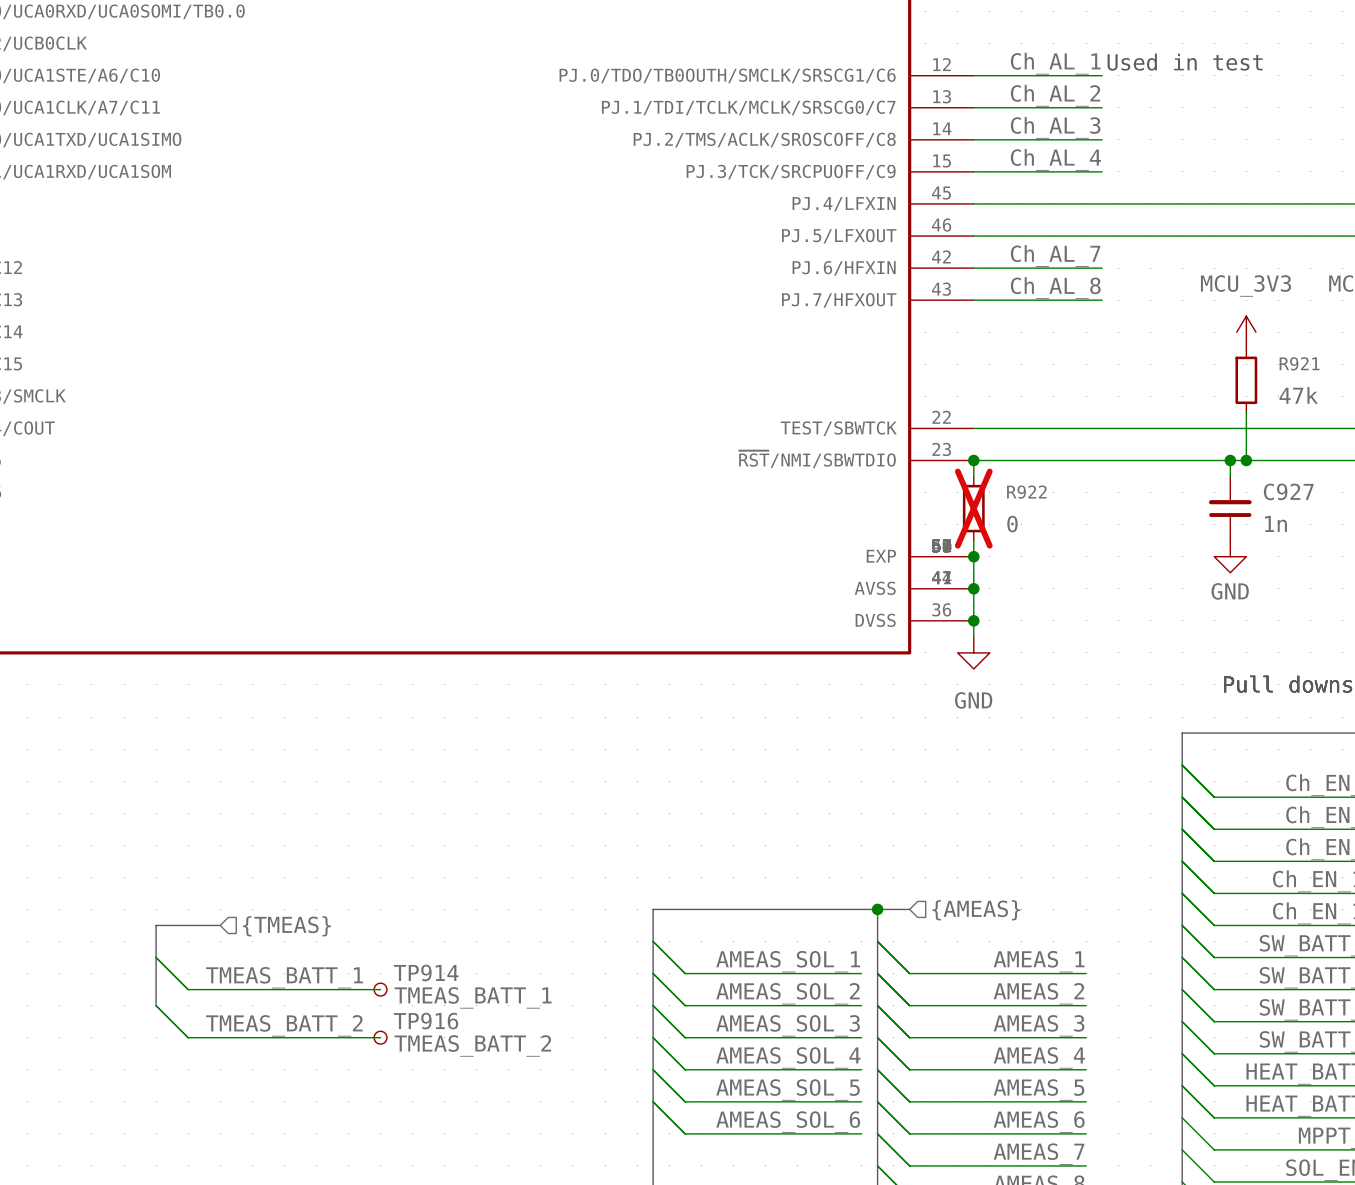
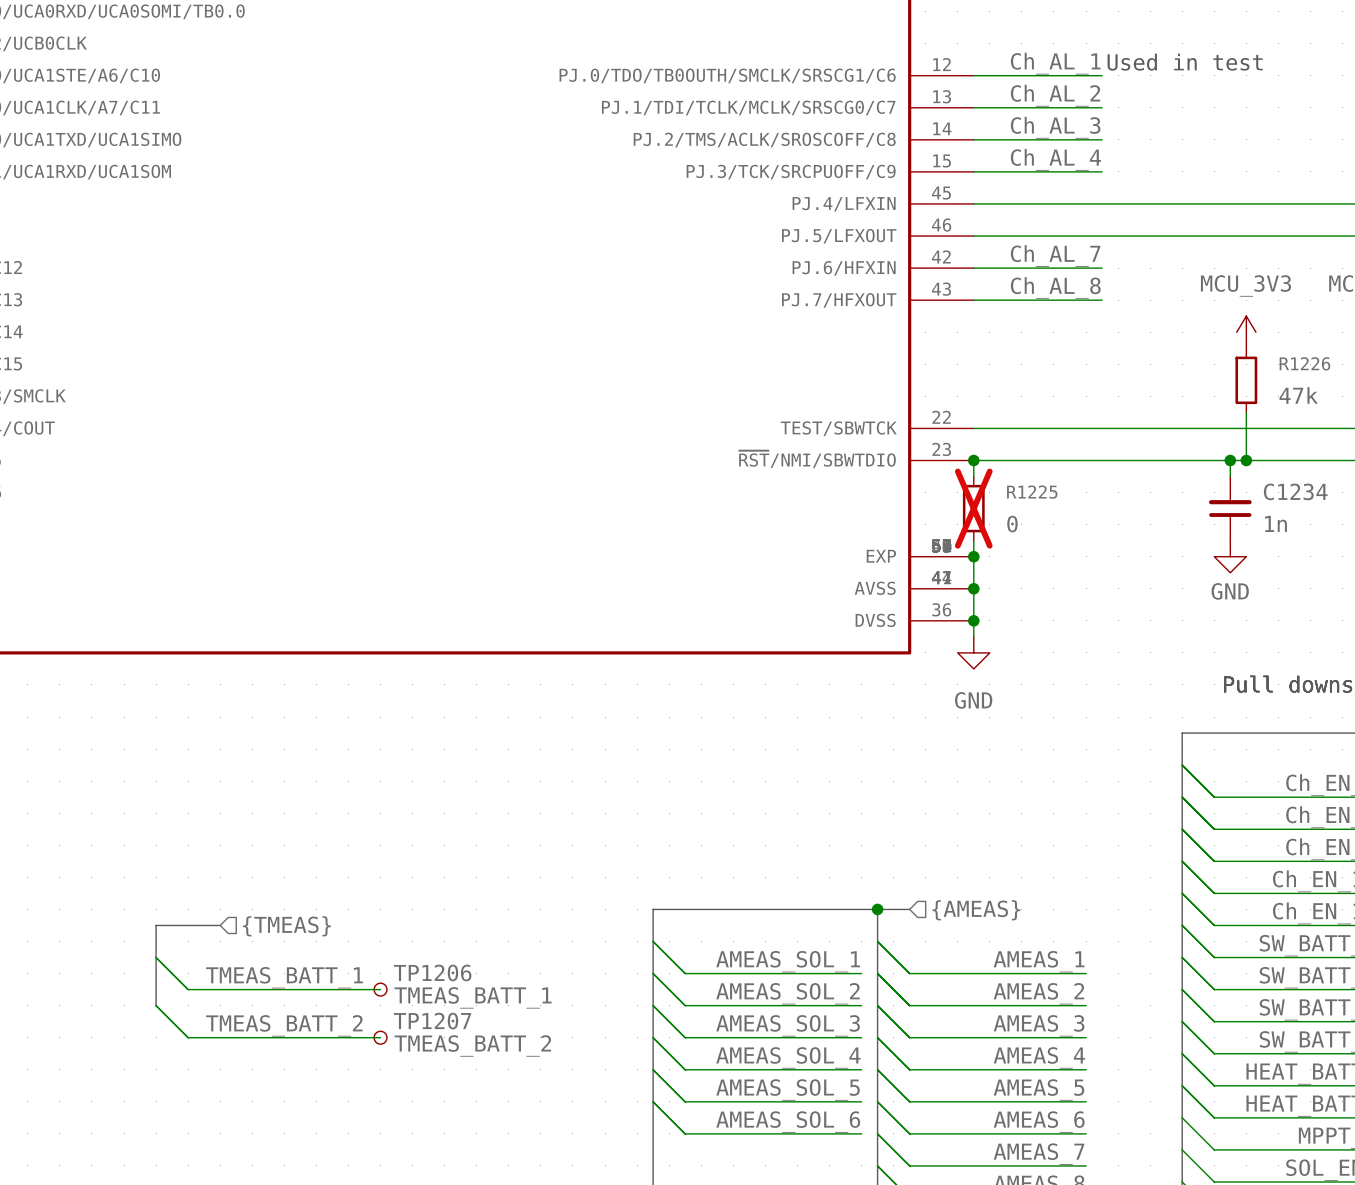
R921 name: R921 (1299, 363) -> R1226 (1304, 363)
C927 name: C927 (1288, 491) -> C1234 (1295, 491)
R922 name: R922 (1026, 492) -> R1225 (1032, 492)
TP914 name: TP914 (426, 972) -> TP1206 (432, 972)
TP916 name: TP916 (426, 1021) -> TP1207 (432, 1021)

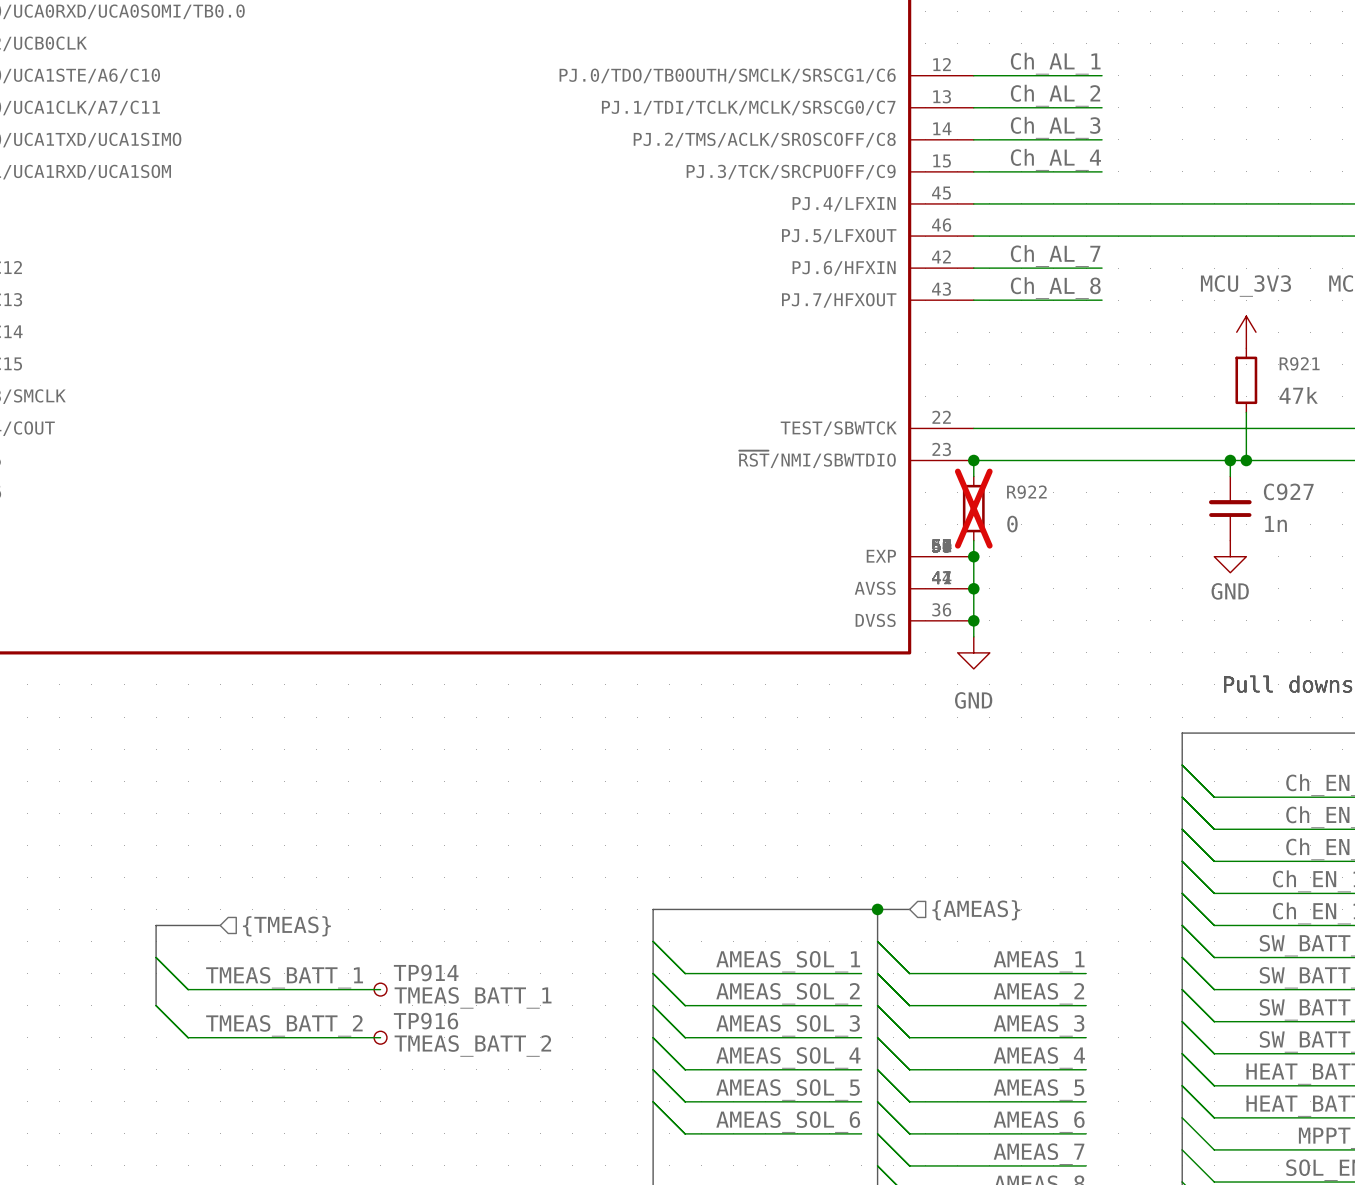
text: Used in test (1185, 62) -> none
R1226 name: R1226 (1304, 363) -> R921 (1299, 363)
C1234 name: C1234 (1295, 491) -> C927 (1288, 491)
R1225 name: R1225 (1032, 492) -> R922 (1026, 492)
TP1206 name: TP1206 (432, 972) -> TP914 (426, 972)
TP1207 name: TP1207 (432, 1021) -> TP916 (426, 1021)

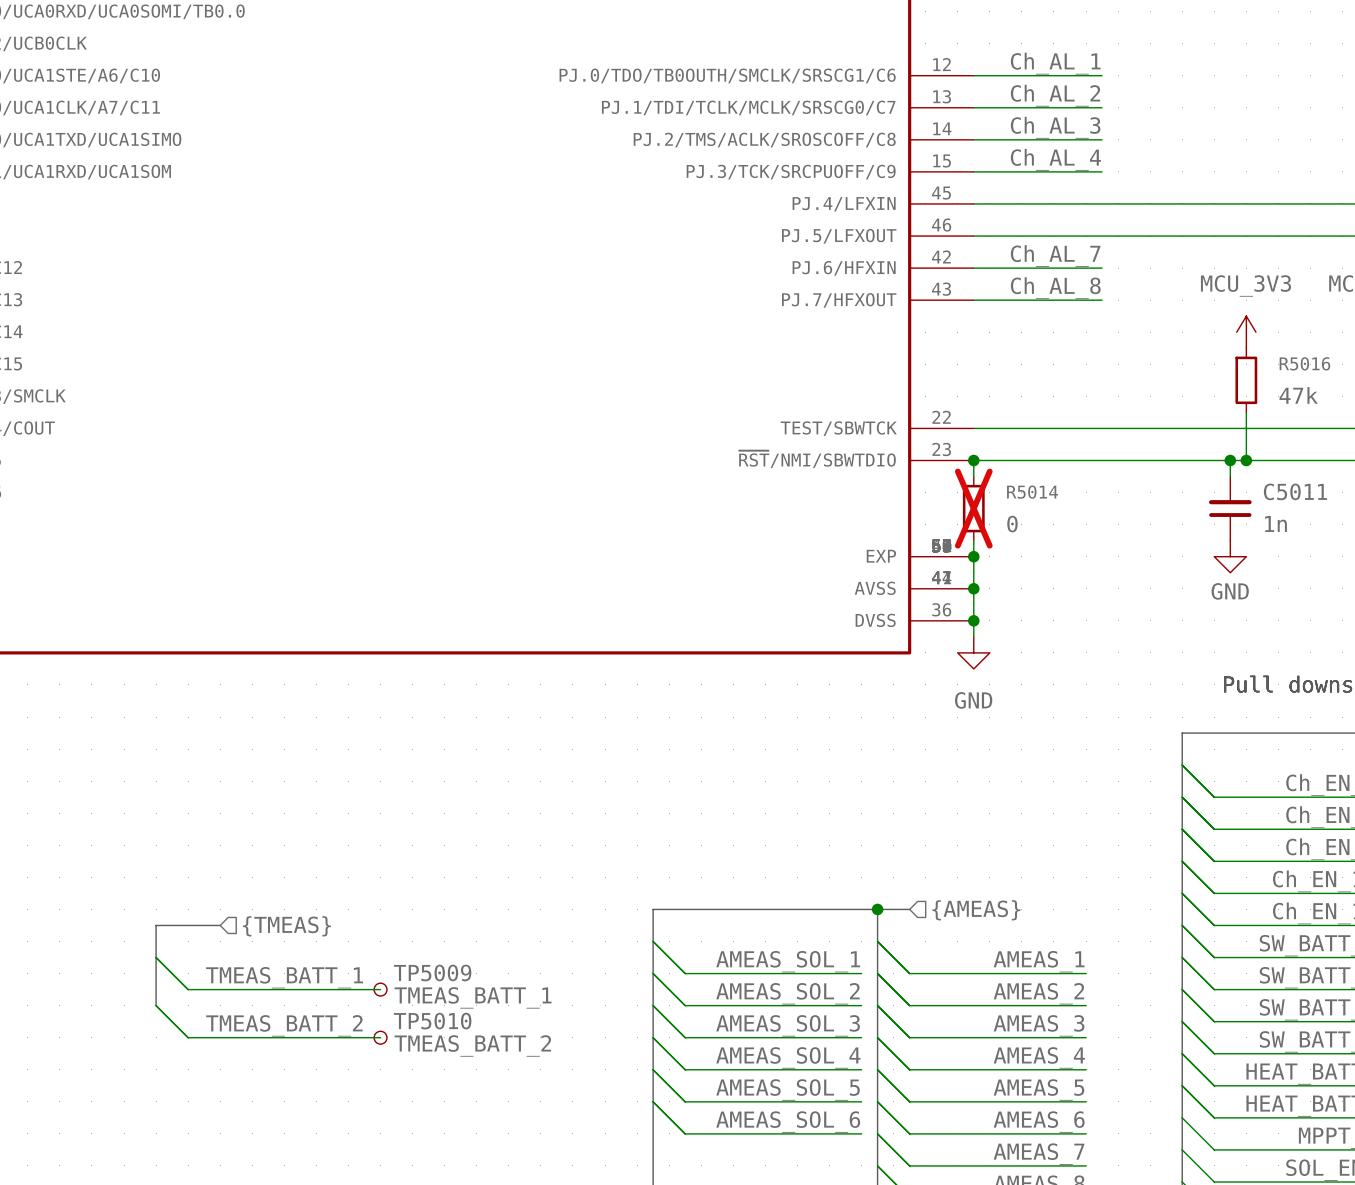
R921 name: R921 (1299, 363) -> R5016 (1304, 363)
C927 name: C927 (1288, 491) -> C5011 (1295, 491)
R922 name: R922 (1026, 492) -> R5014 (1032, 492)
TP914 name: TP914 (426, 972) -> TP5009 (432, 972)
TP916 name: TP916 (426, 1021) -> TP5010 (432, 1021)

